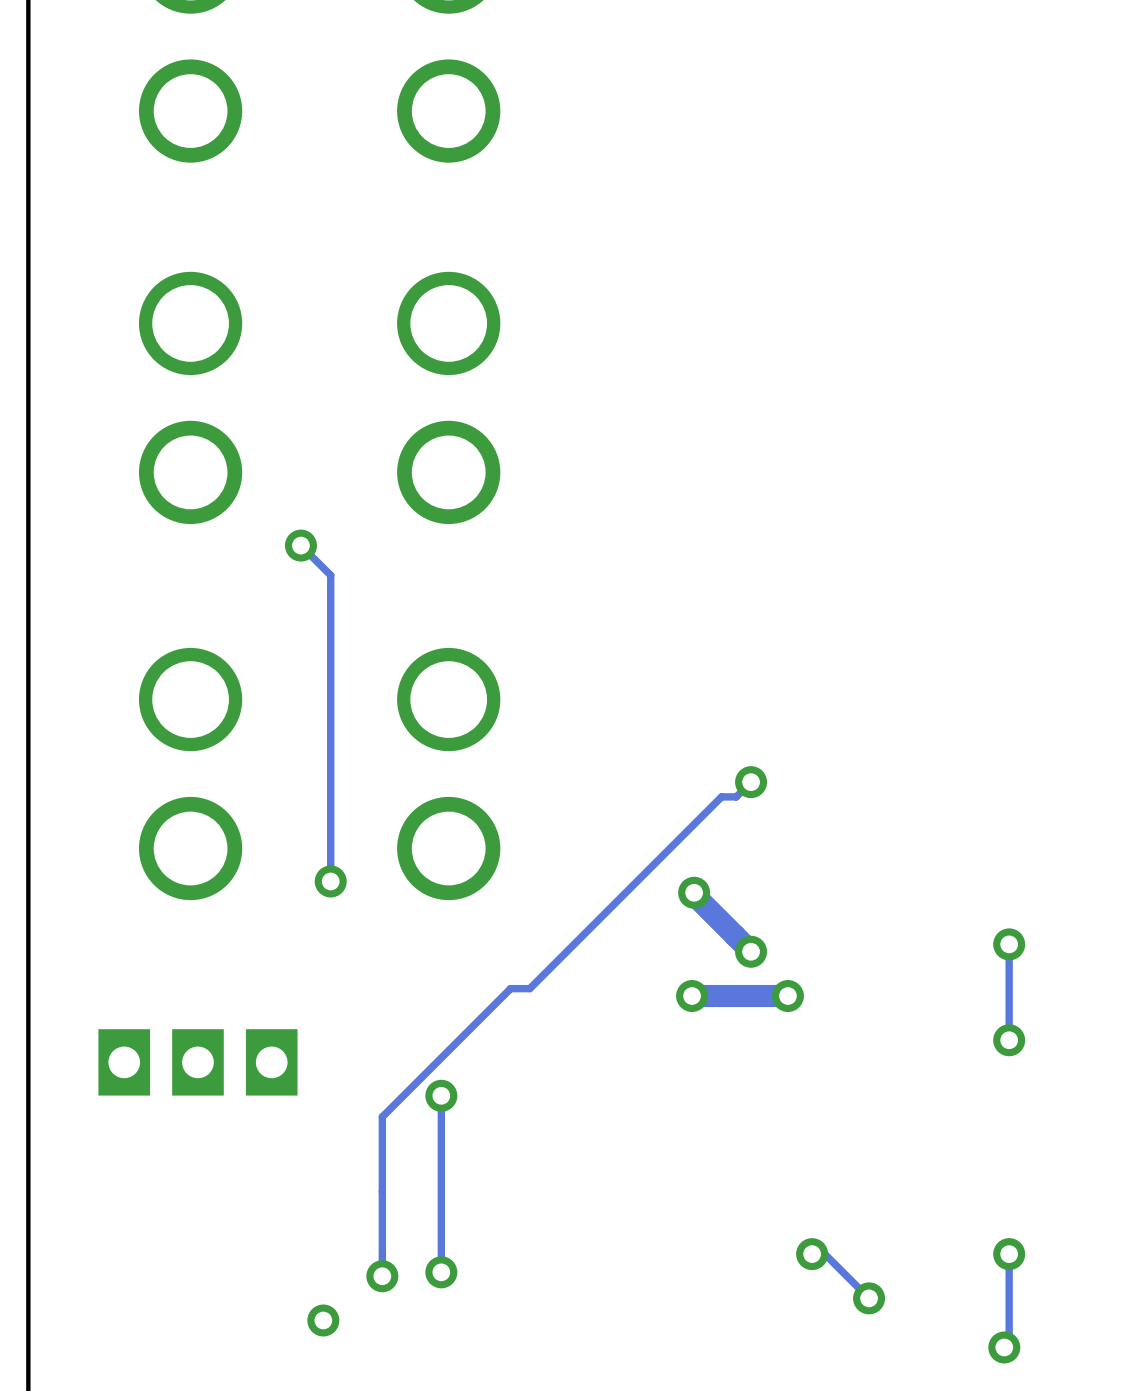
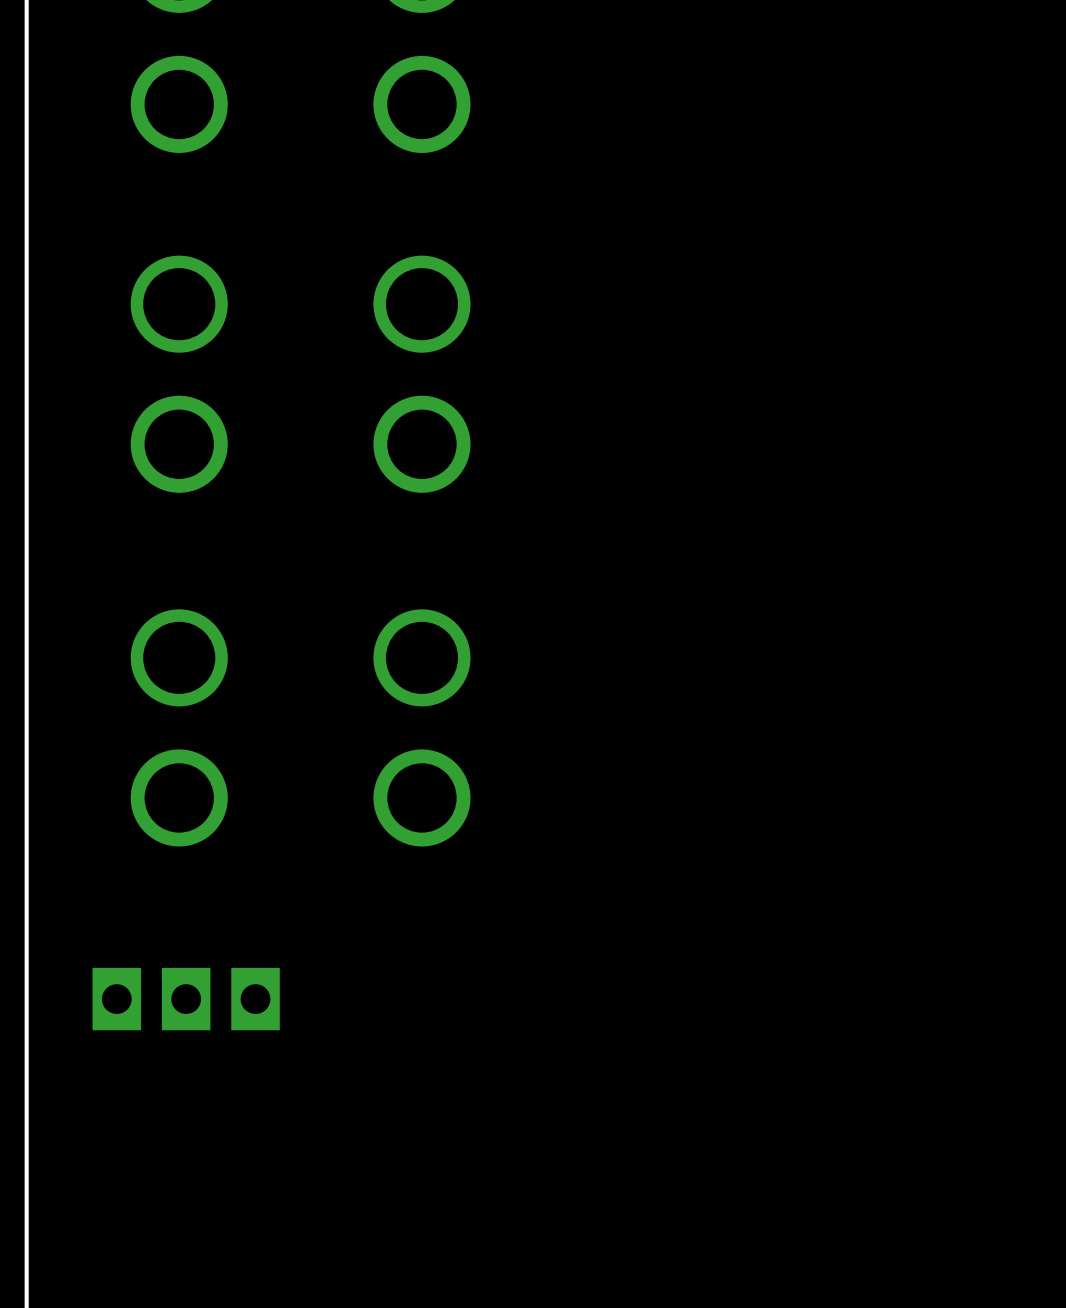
track: (300, 545) (330, 575) (330, 881) -> none
via: (300, 545) -> none
track: (751, 782) (736, 796) (721, 796) (529, 988) (510, 988) (382, 1116) (382, 1276) -> none
via: (751, 782) -> none
via: (330, 881) -> none
track: (694, 892) (751, 951) -> none
via: (694, 892) -> none
track: (1009, 944) (1009, 1040) -> none
via: (1009, 944) -> none
via: (751, 951) -> none
via: (692, 996) -> none
track: (787, 996) (692, 996) -> none
via: (787, 996) -> none
via: (1009, 1040) -> none
track: (441, 1095) (441, 1272) -> none
via: (441, 1095) -> none
track: (812, 1254) (824, 1254) (869, 1298) -> none
via: (812, 1254) -> none
track: (1009, 1254) (1009, 1342) (1004, 1347) -> none
via: (1009, 1254) -> none
via: (441, 1272) -> none
via: (382, 1276) -> none
via: (869, 1298) -> none
via: (323, 1320) -> none
via: (1004, 1347) -> none

